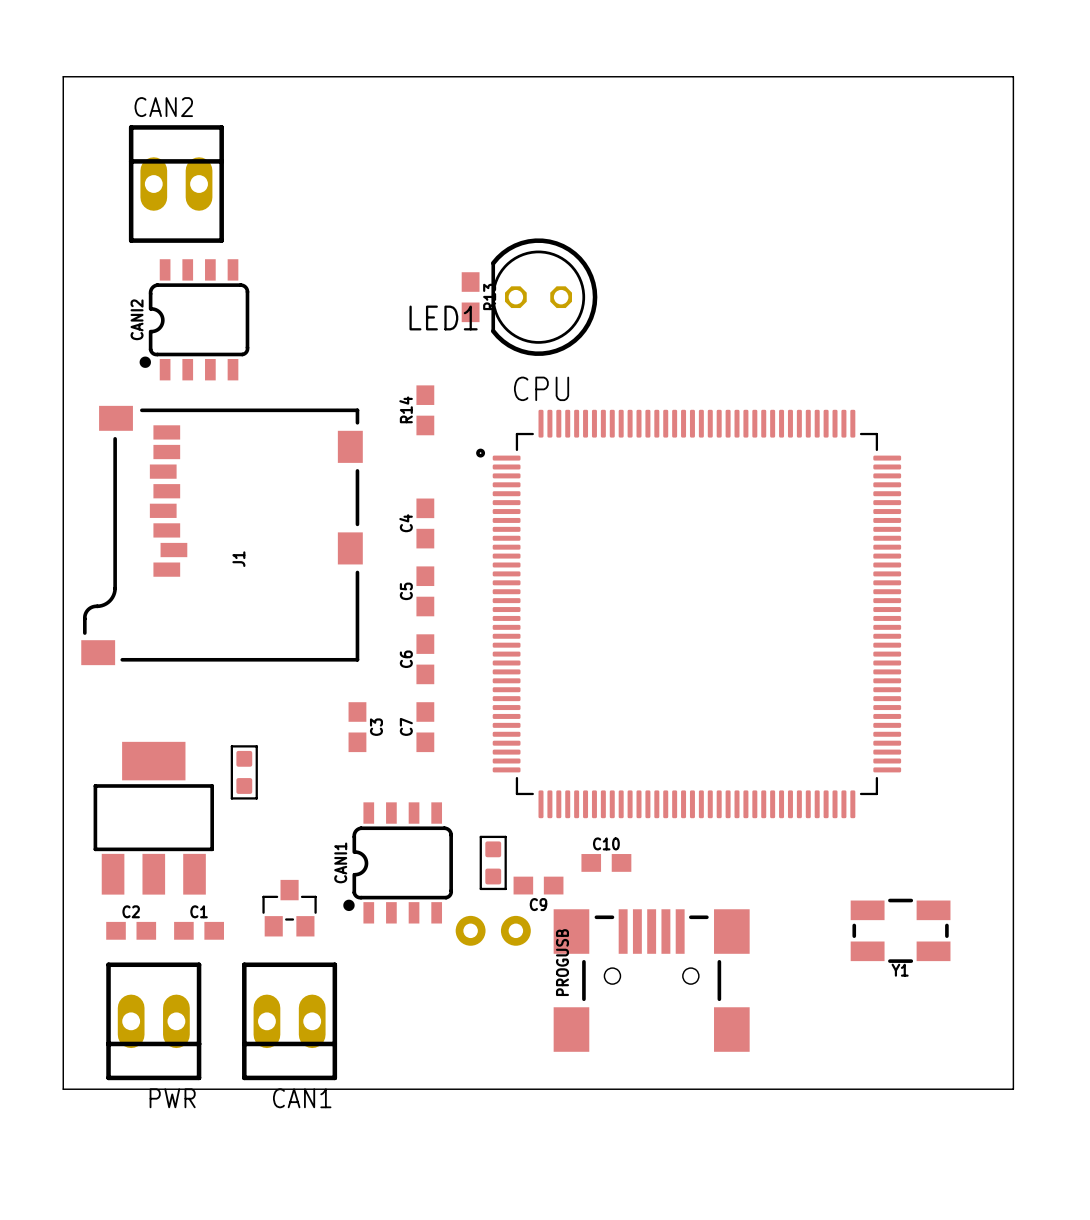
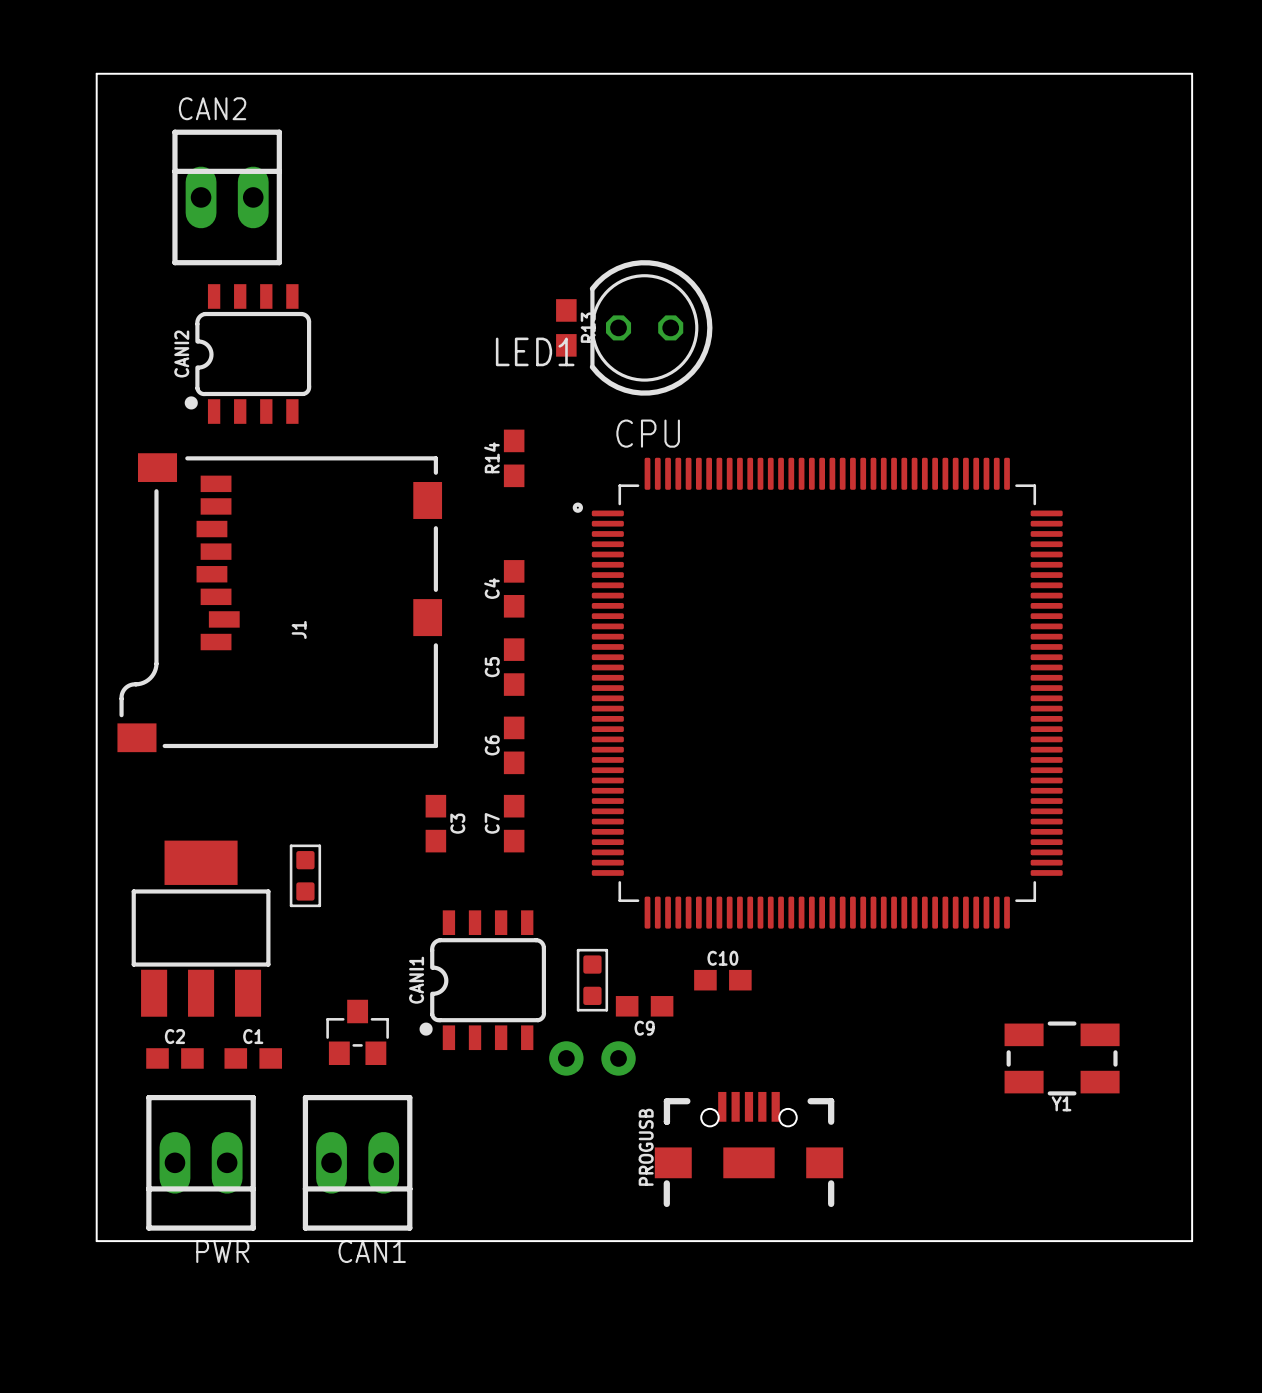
PROGUSB: (651, 980) -> none
PROGUSB: none -> (748, 1149)

